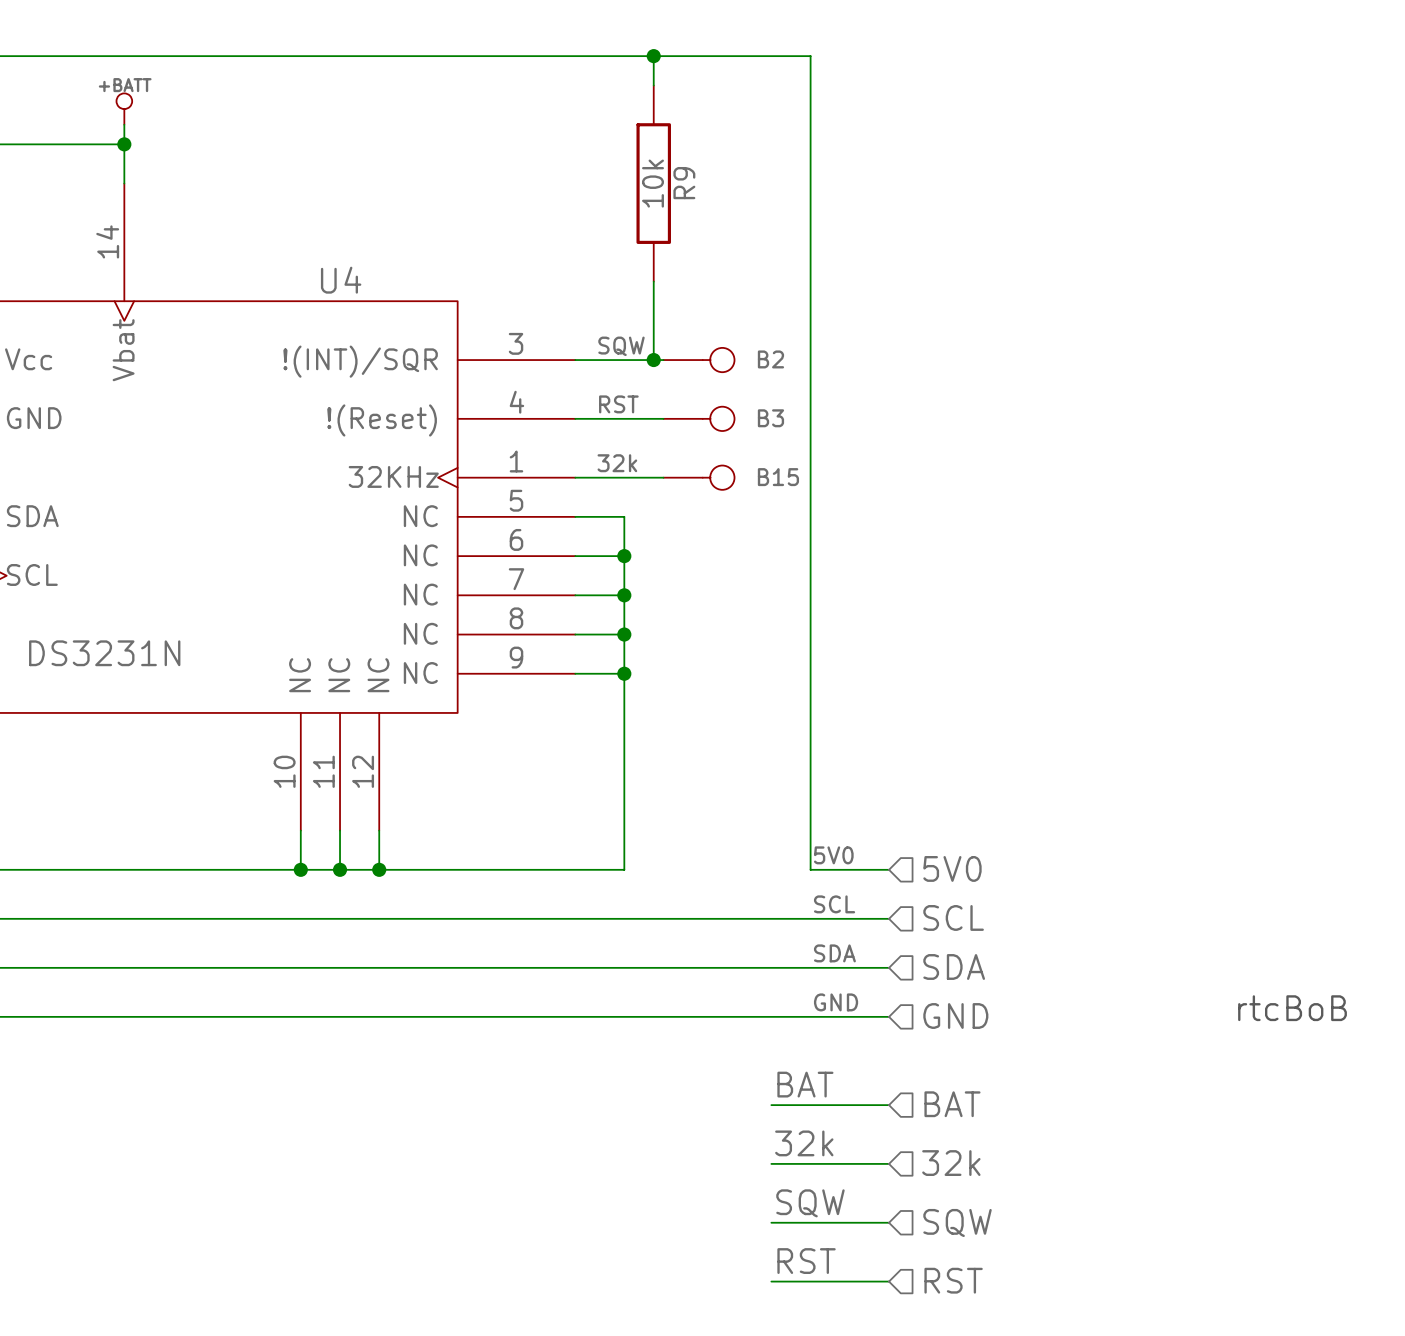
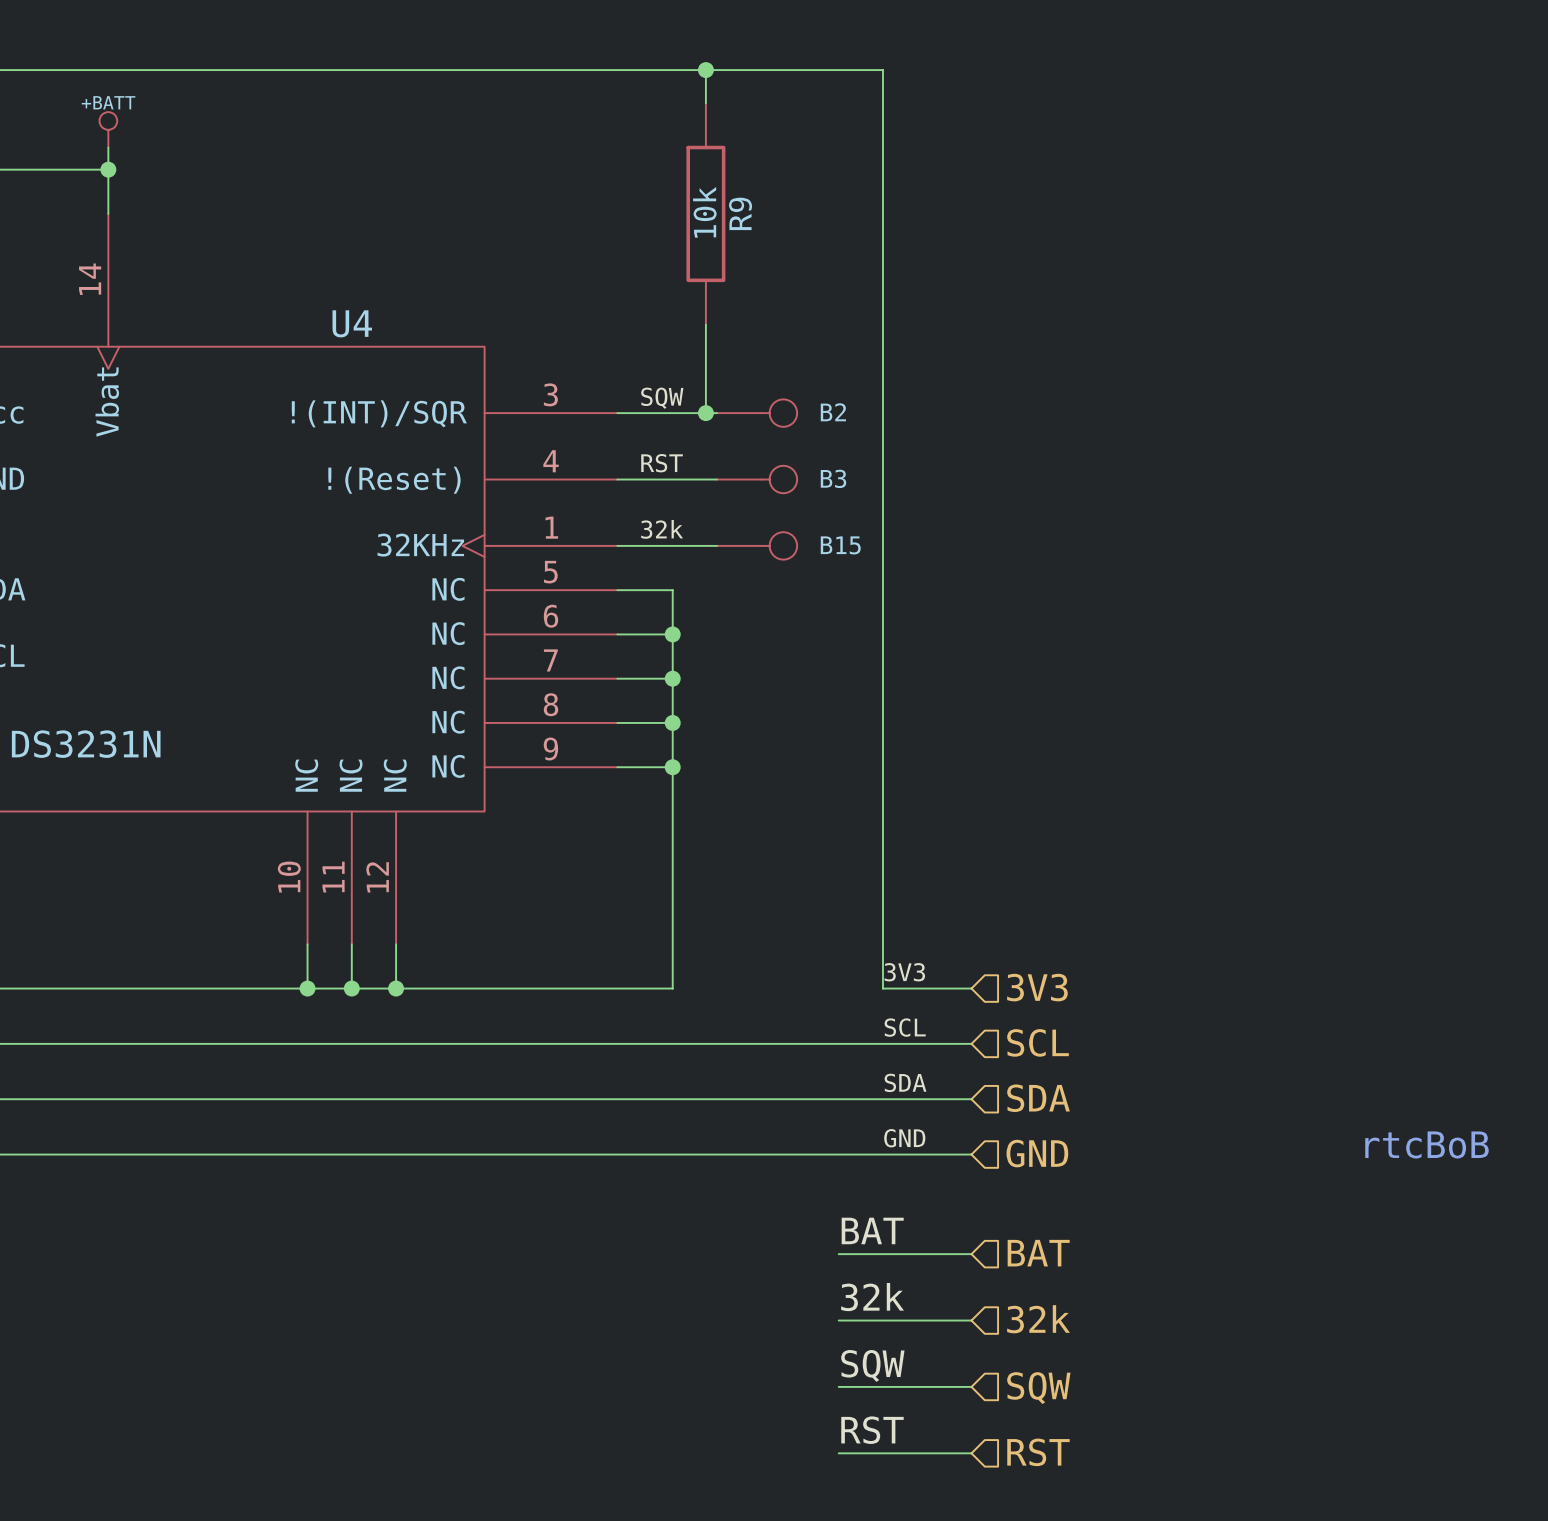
label: 5V0 (833, 855) -> 3V3 (904, 972)
hierarchical label: 5V0 (952, 868) -> 3V3 (1037, 987)

